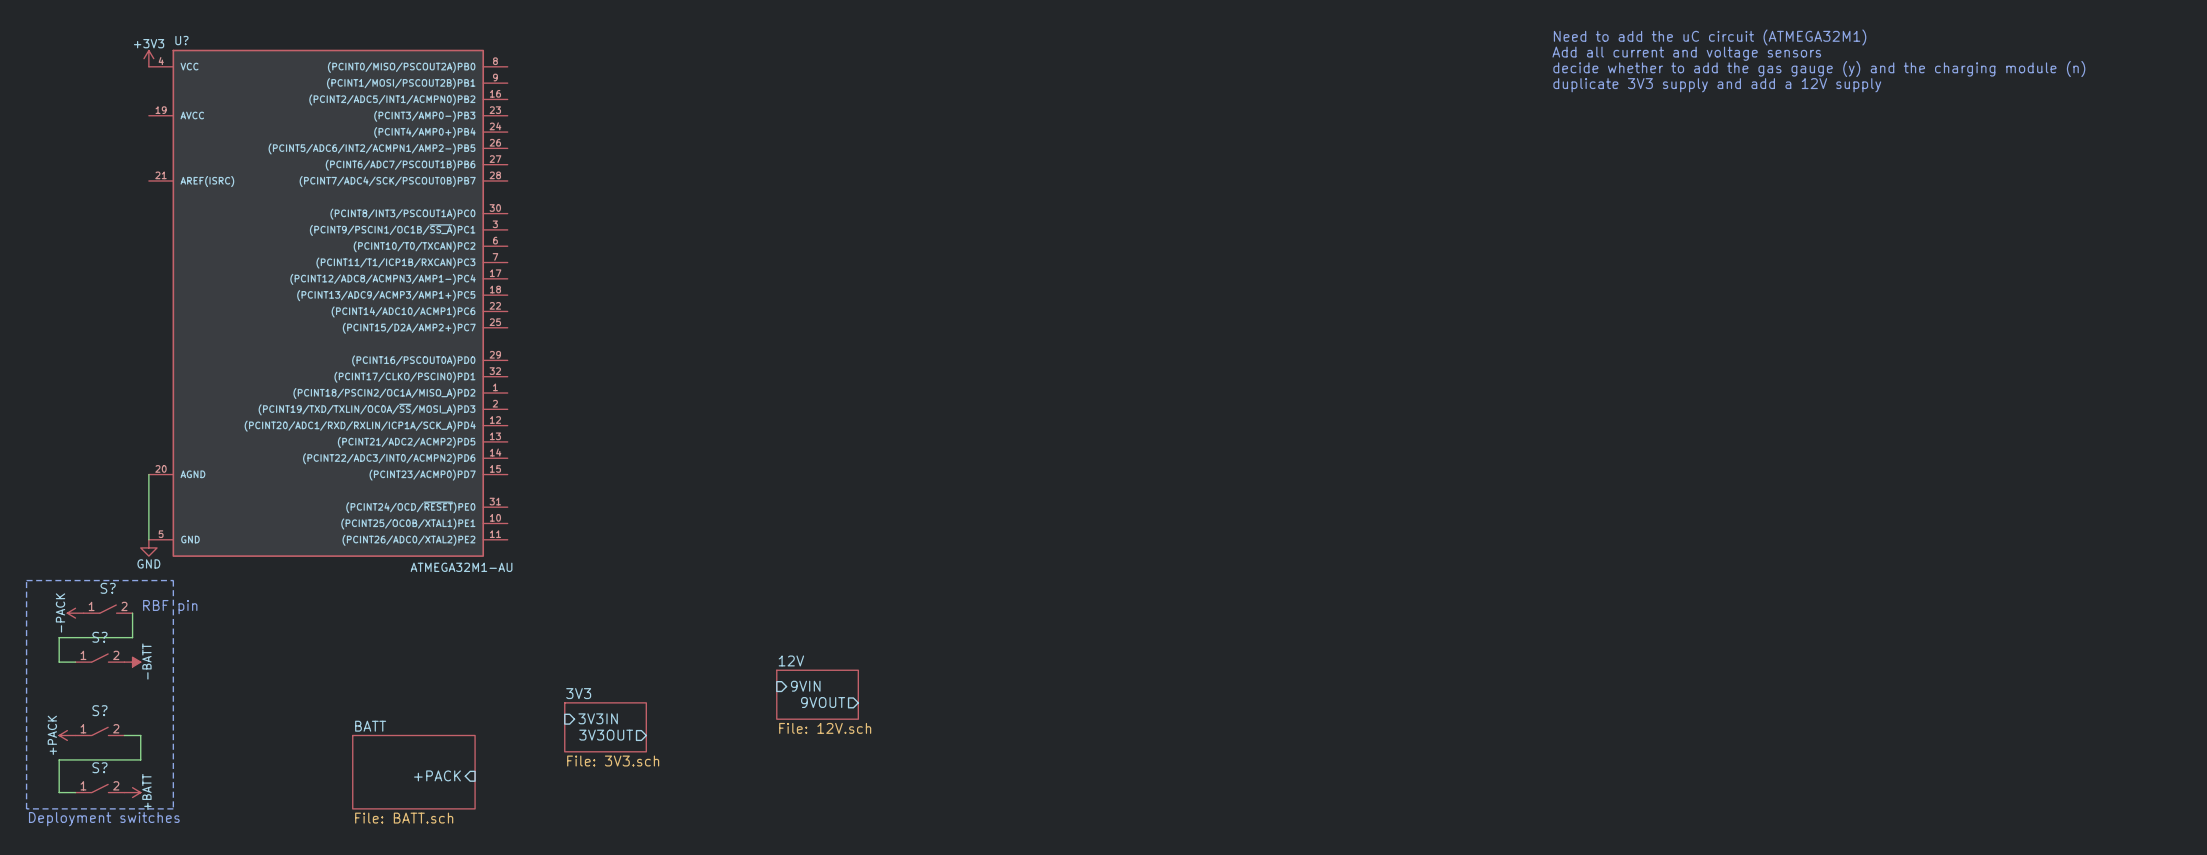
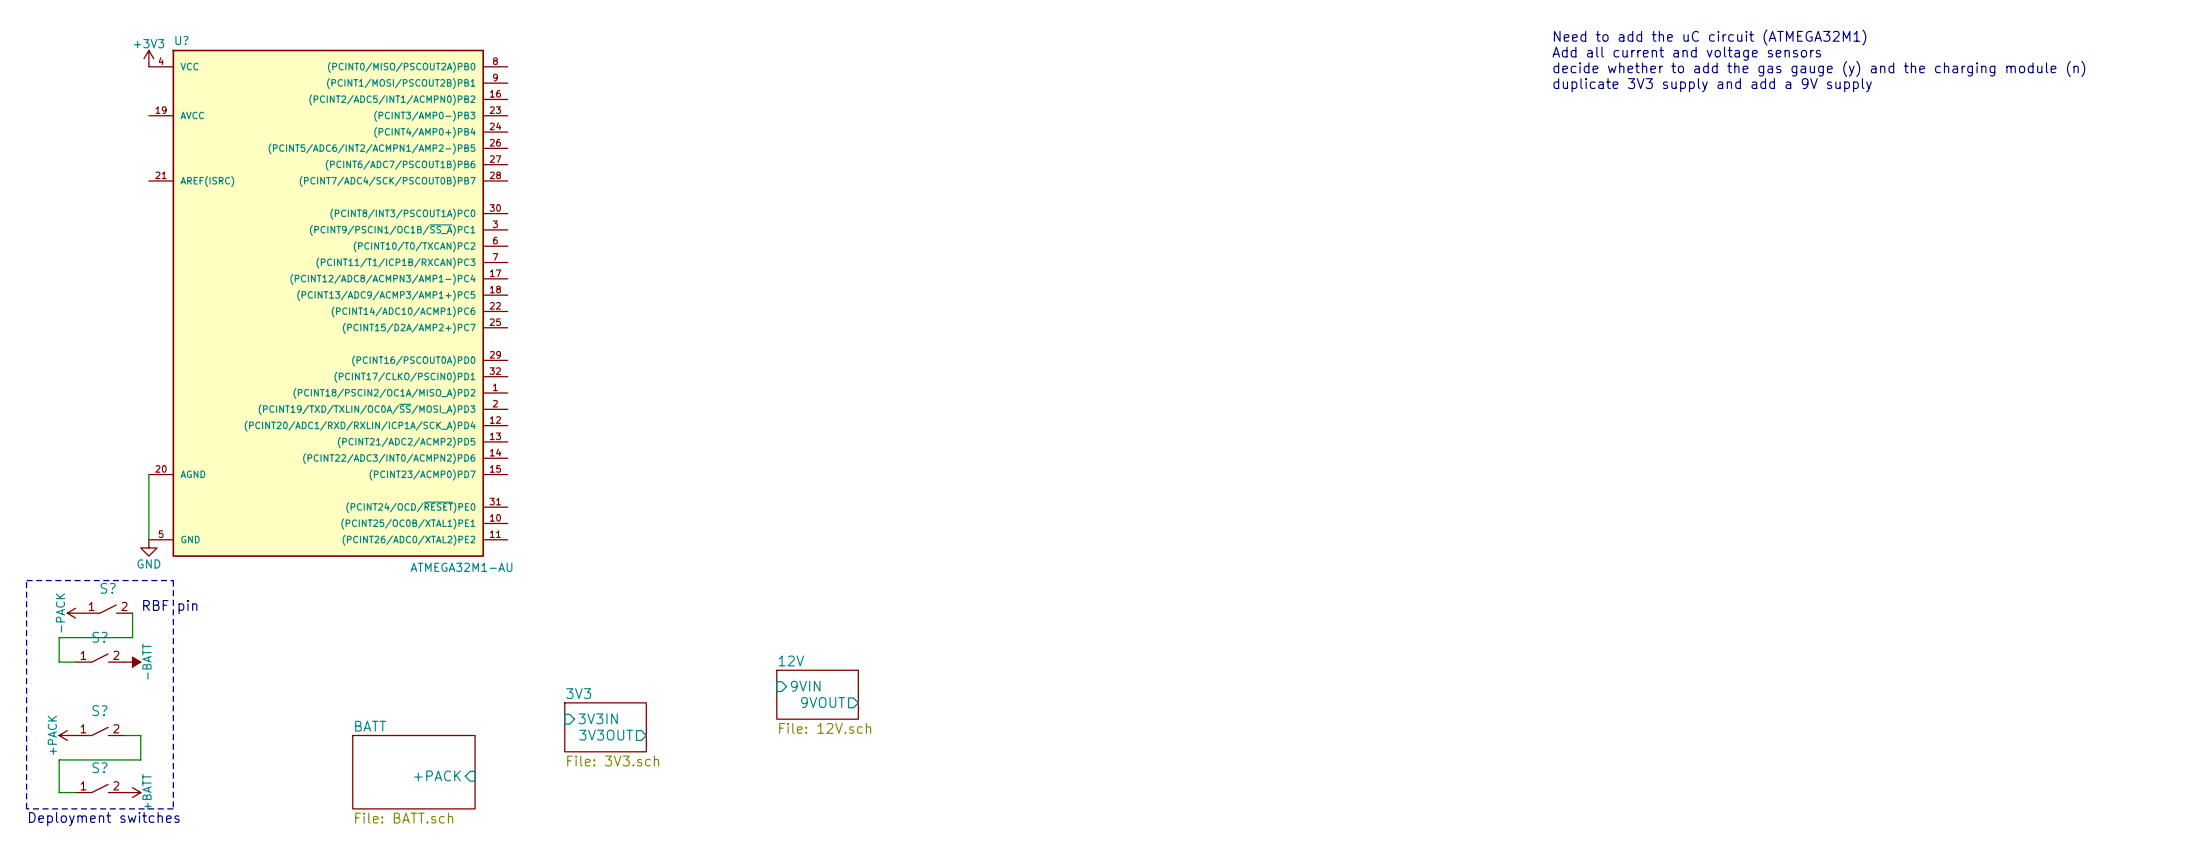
text: duplicate 3V3 supply and add a 12V supply (1717, 85) -> duplicate 3V3 supply and add a 9V supply (1712, 85)

